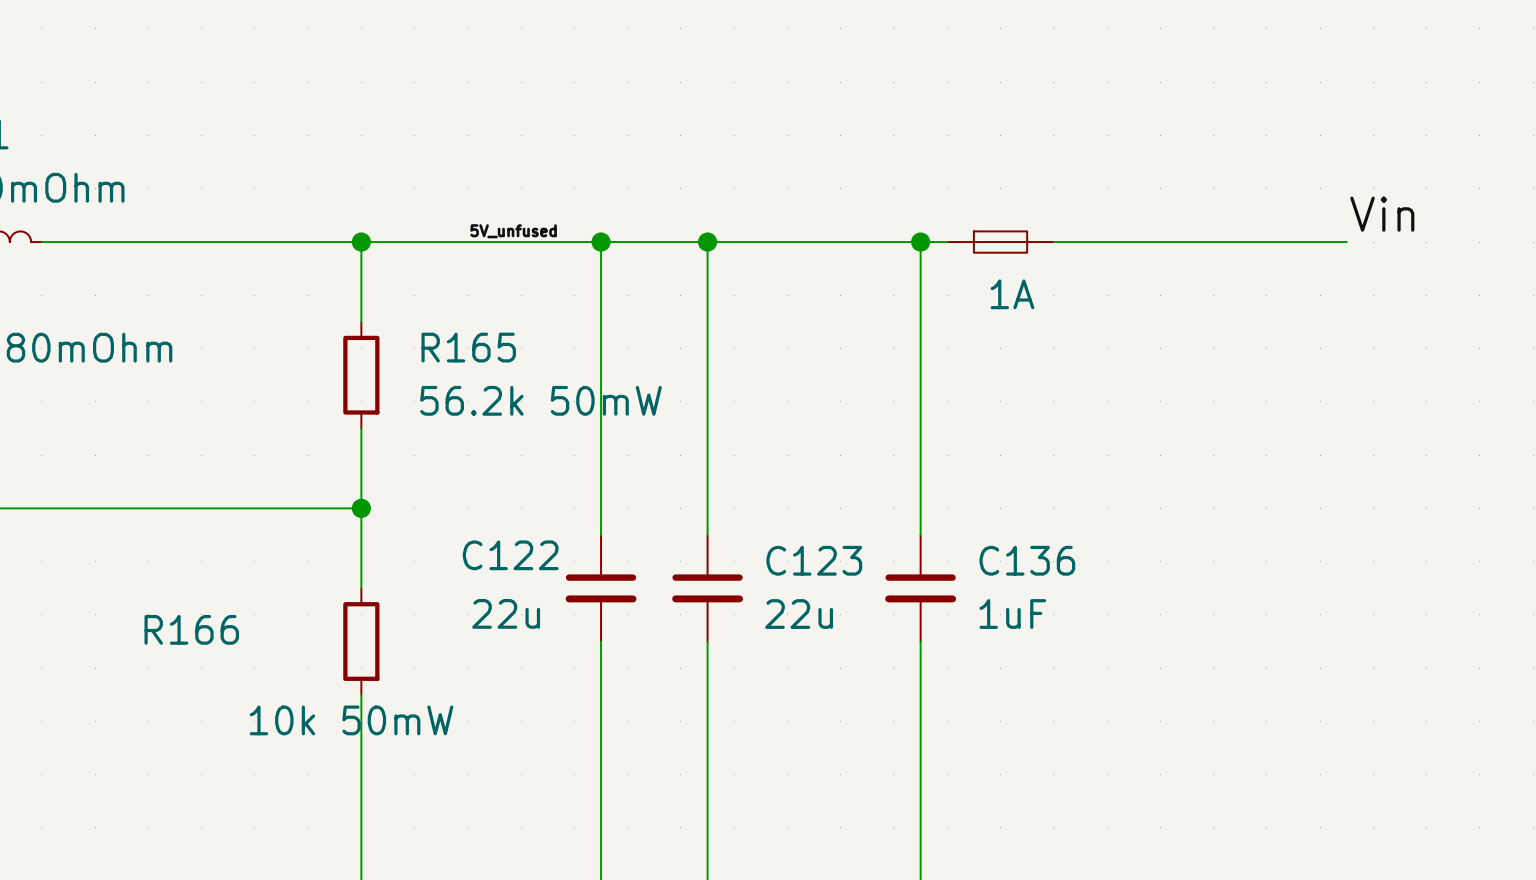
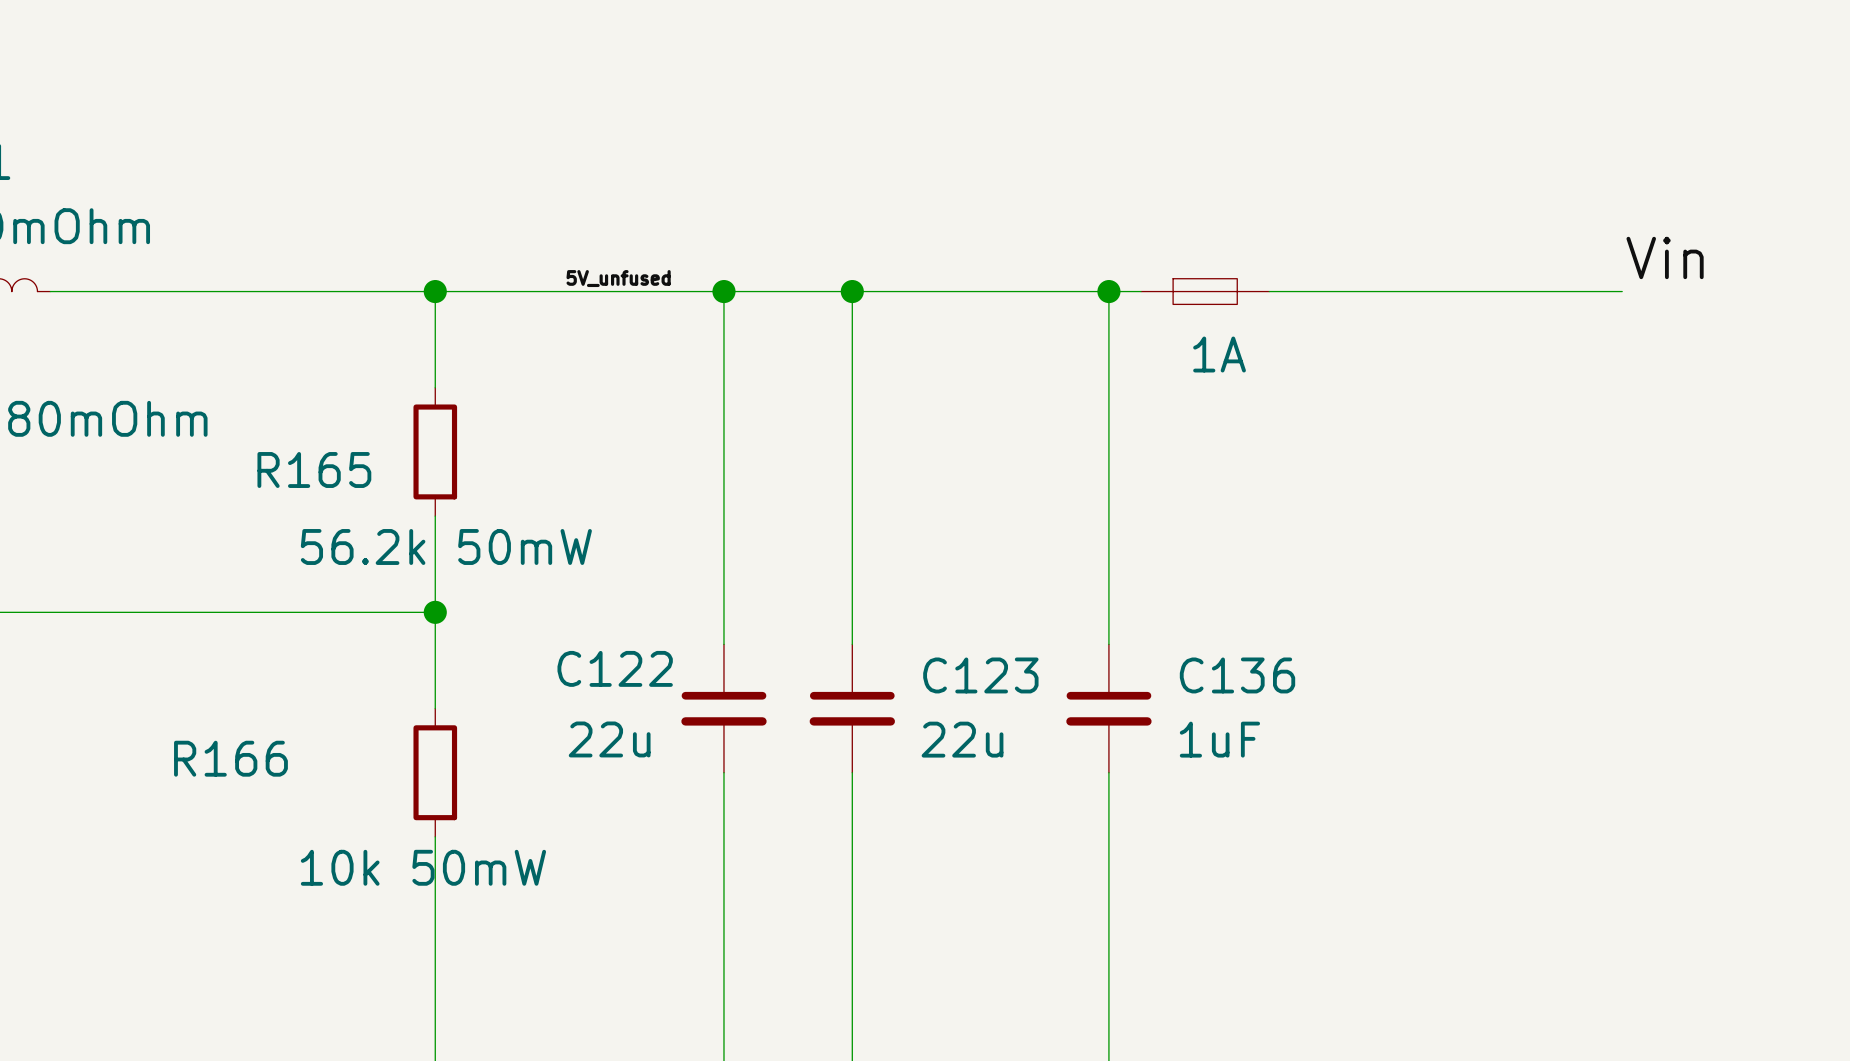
R165 name position: R165 (468, 347) -> R165 (314, 470)
R165 value position: 56.2k 50mW (541, 400) -> 56.2k 50mW (446, 546)

